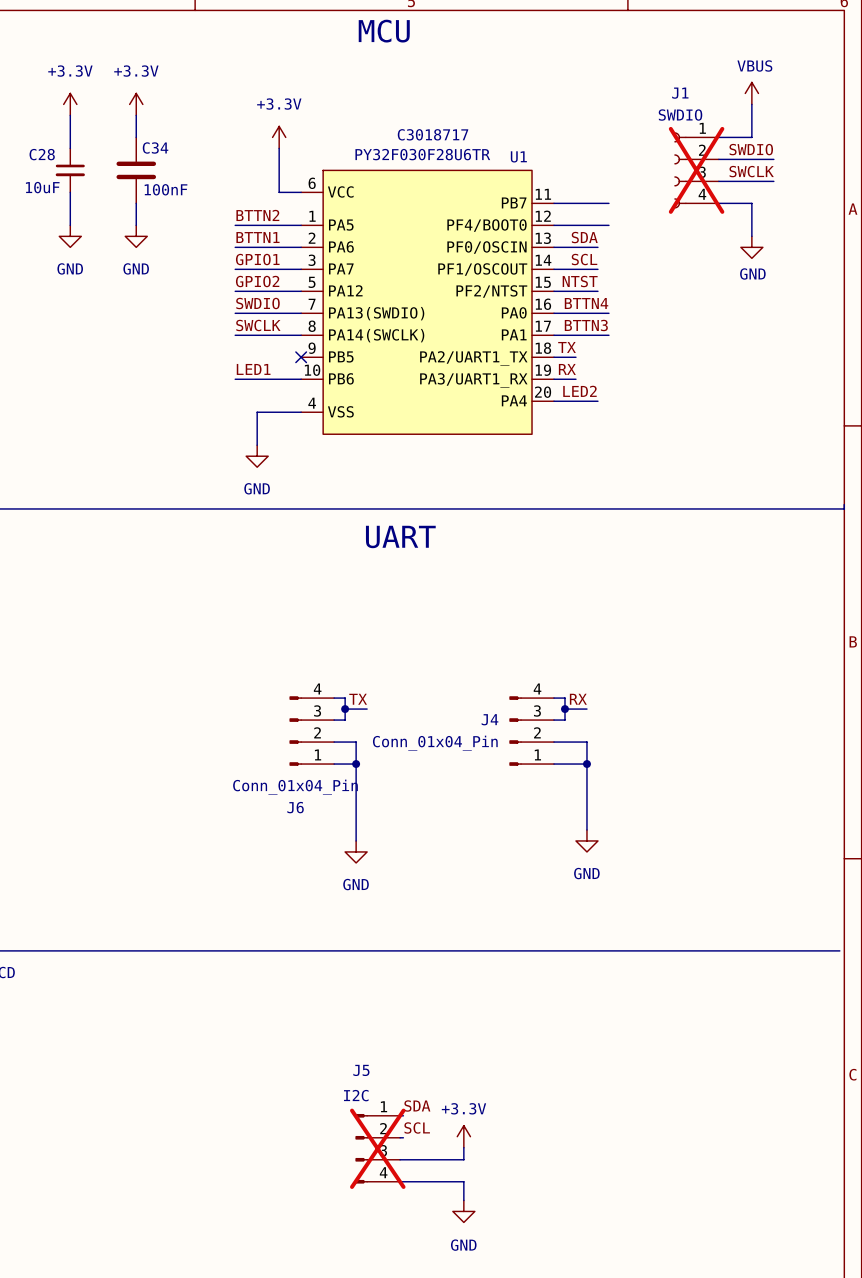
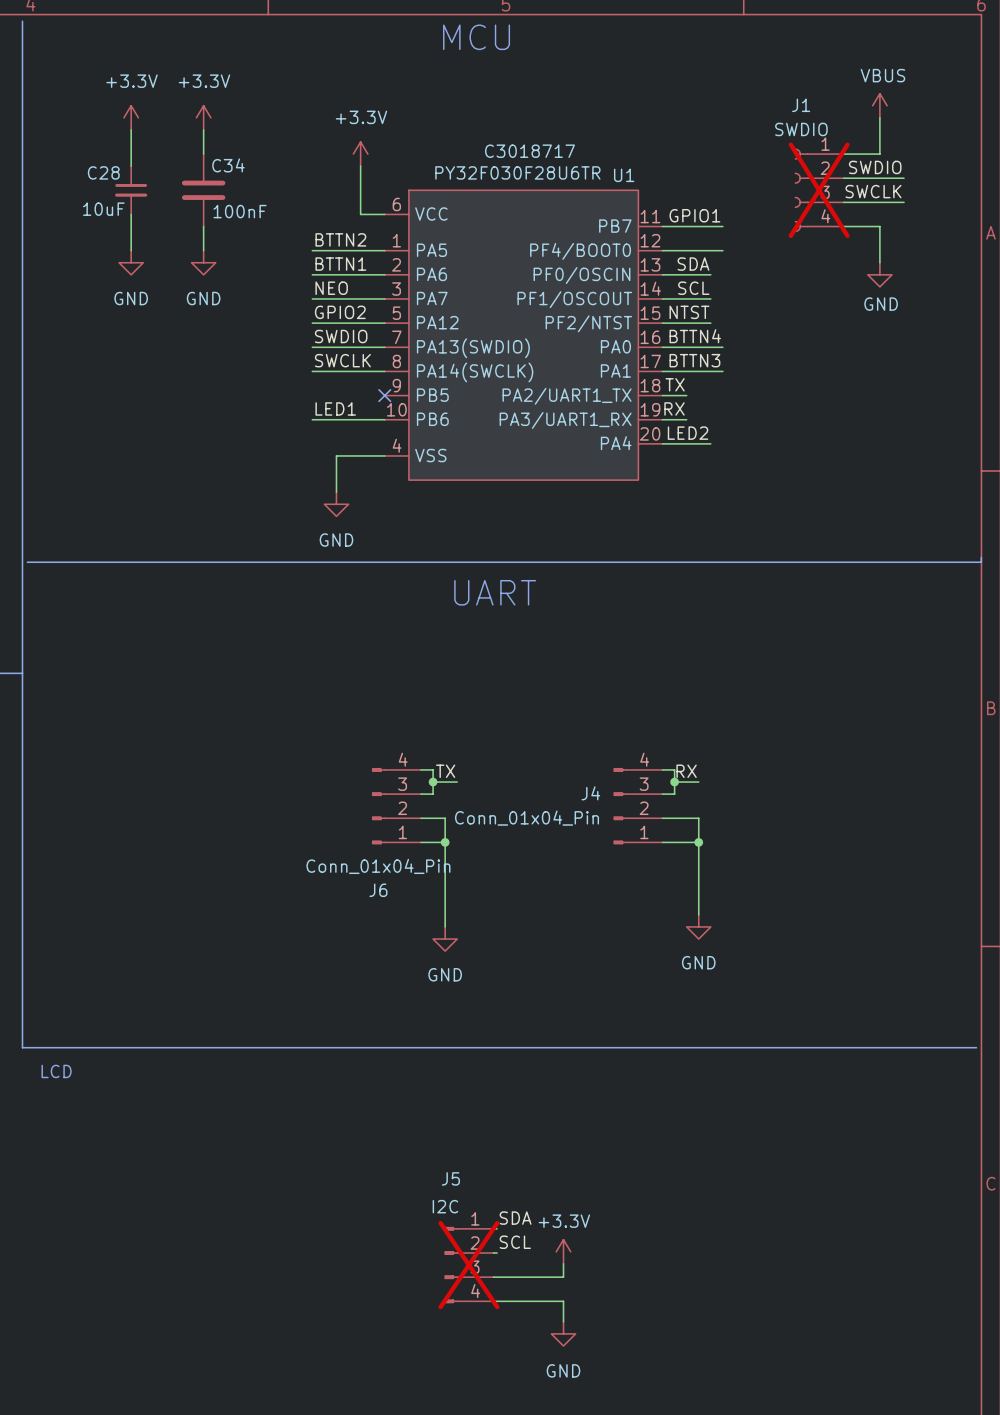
label: none -> GPIO1 (694, 215)
label: GPIO1 (257, 259) -> NEO (331, 288)

